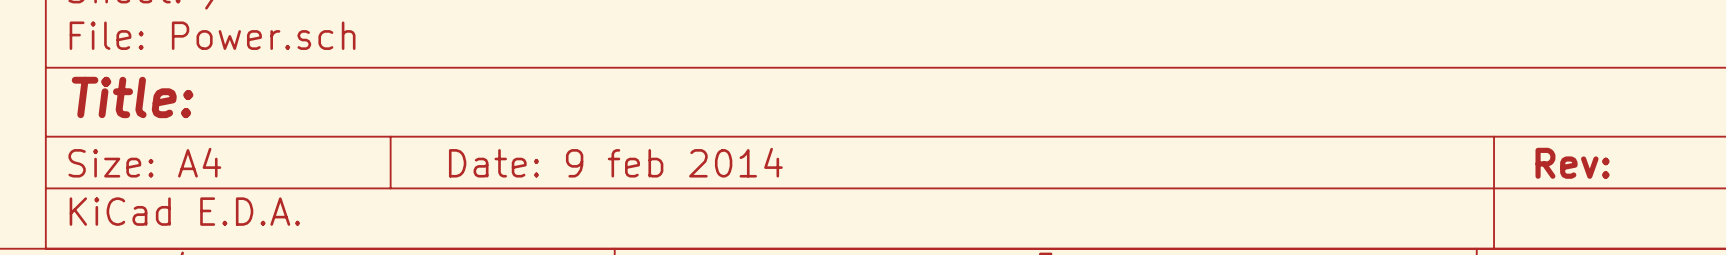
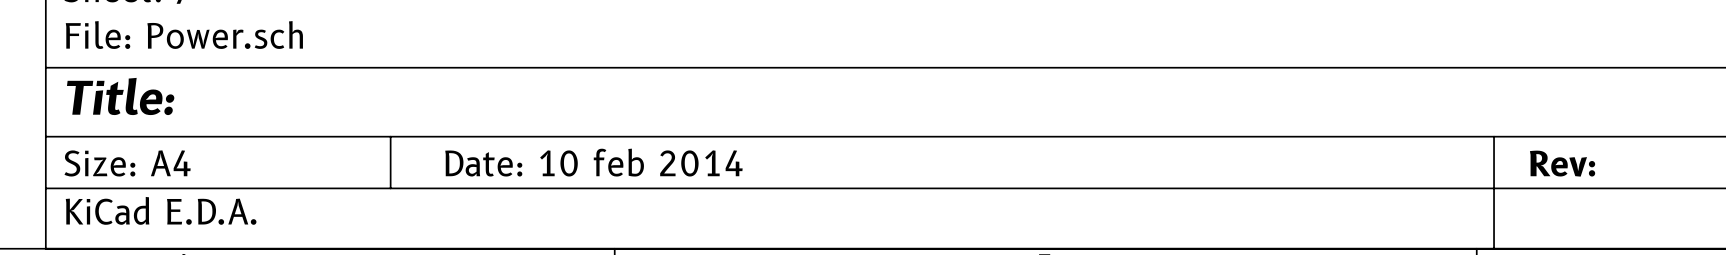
title block: Date: 9 feb 2014 (615, 162) -> Date: 10 feb 2014 (593, 162)

